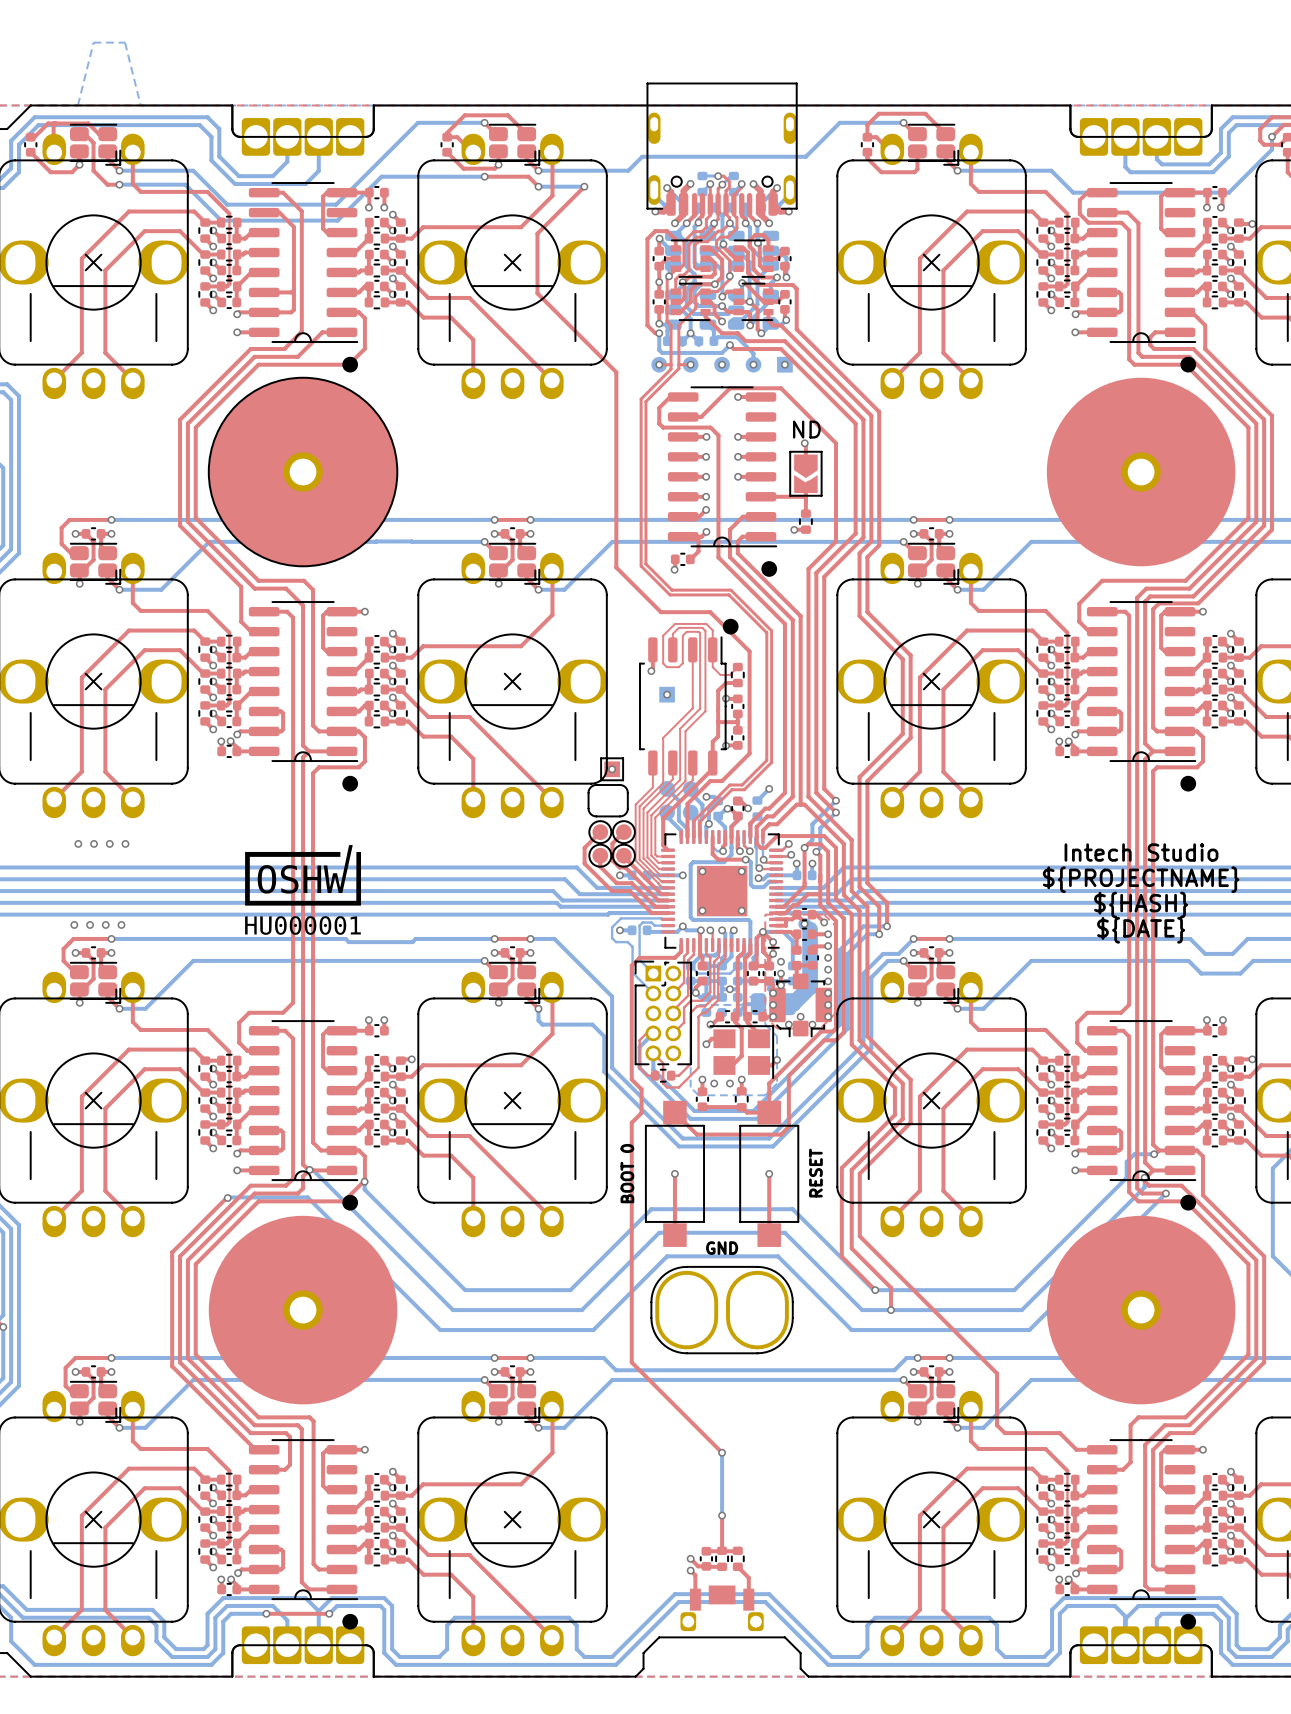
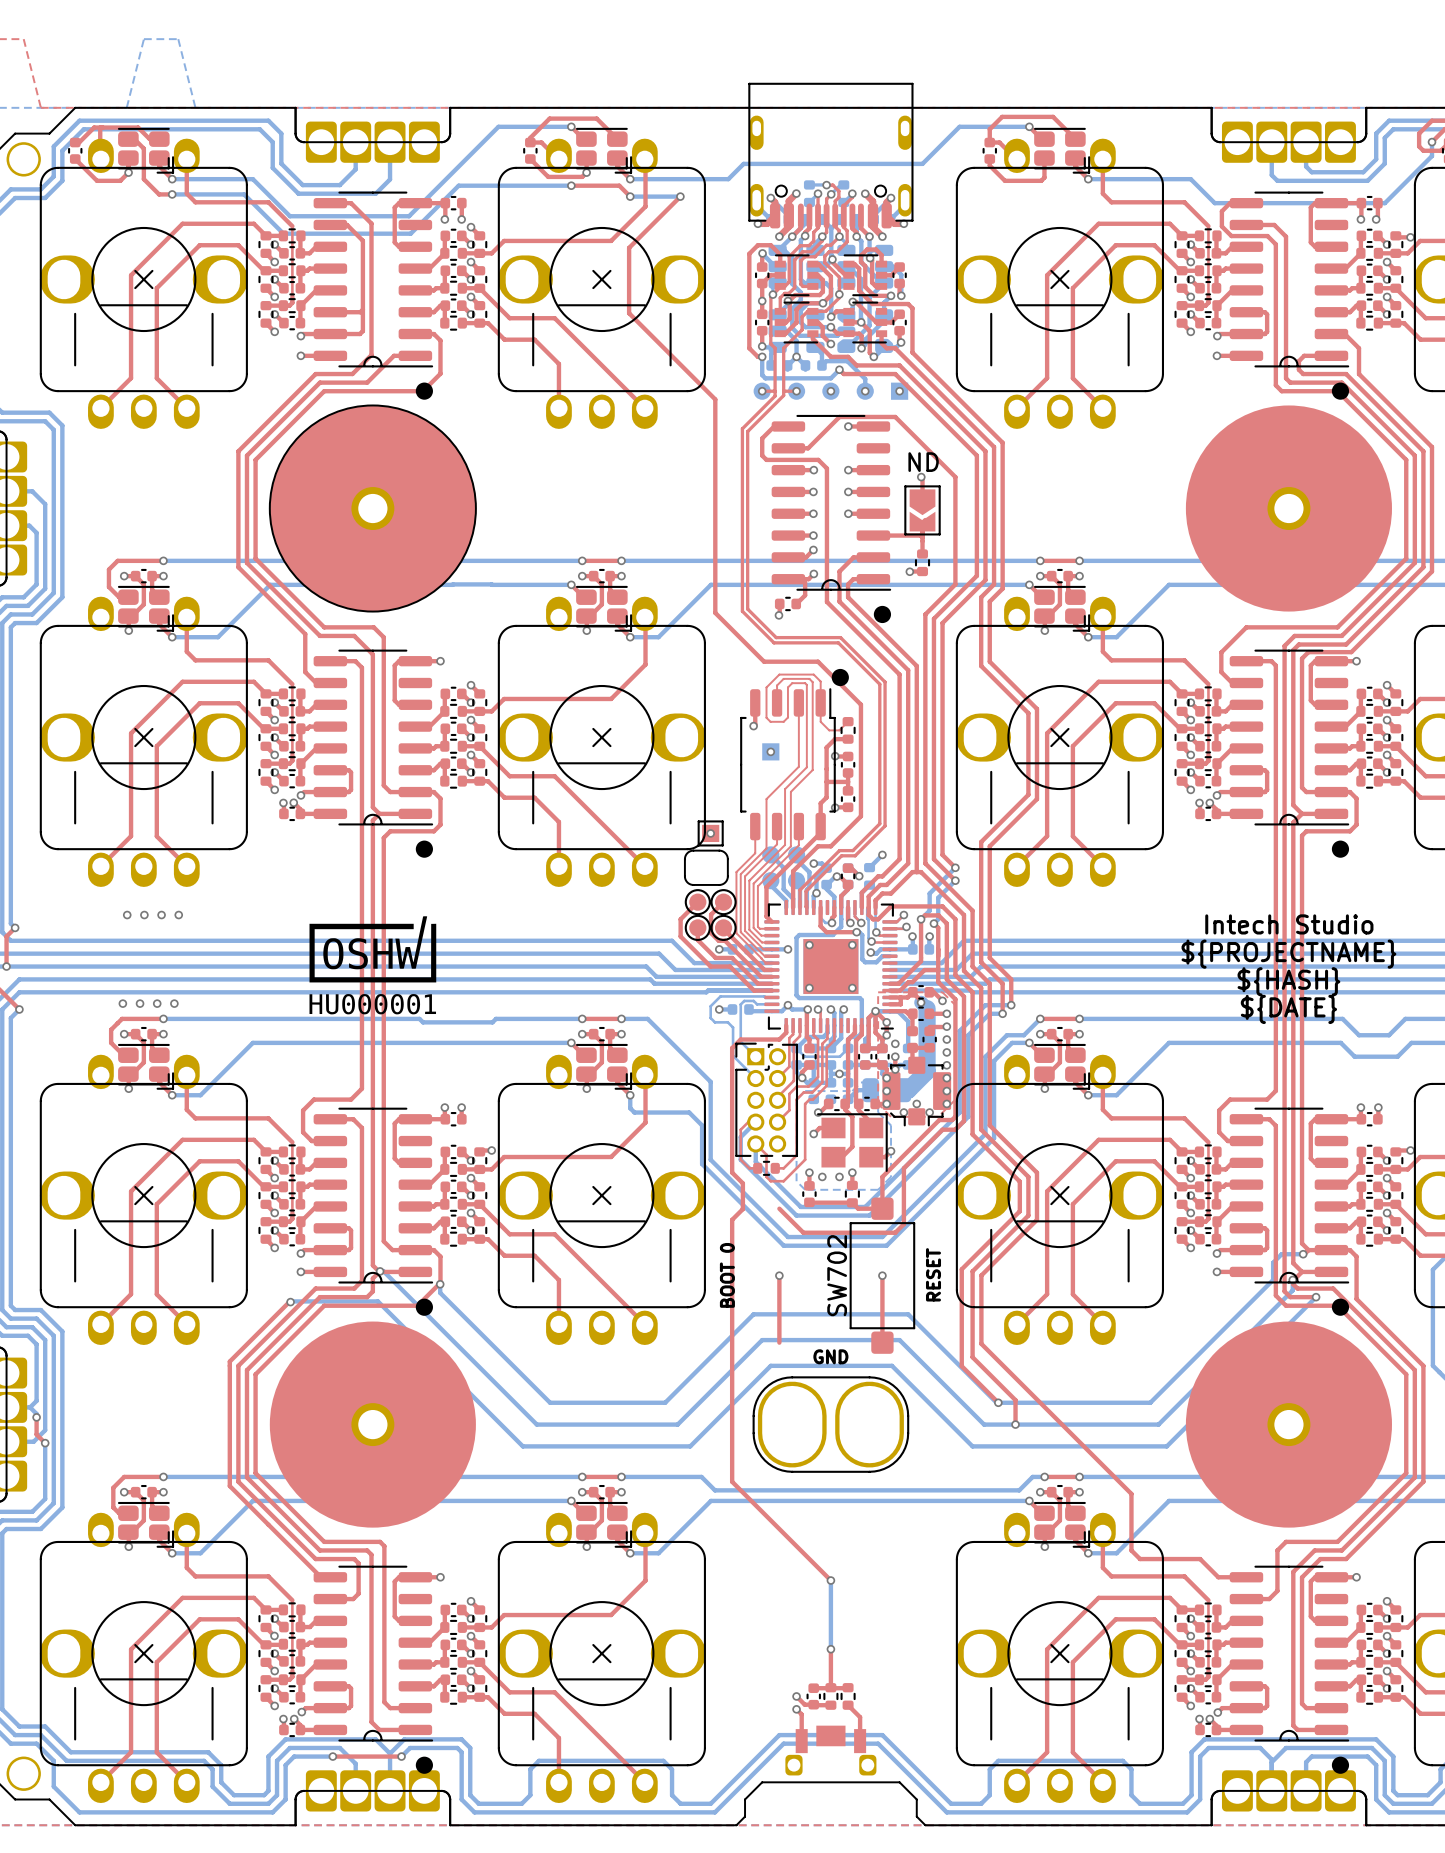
part: (674, 1173) -> none
part: (769, 1173) -> none
SW702: none -> (882, 1275)

